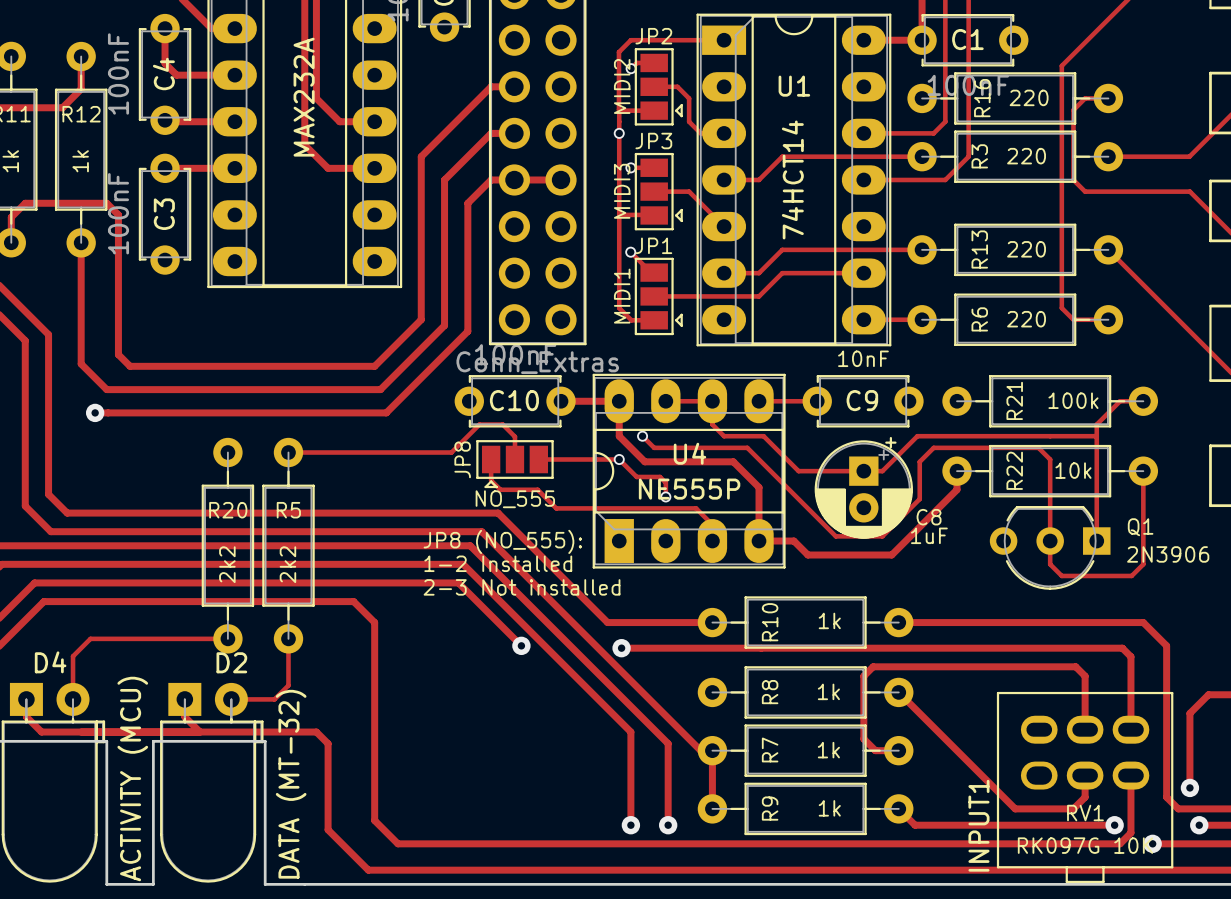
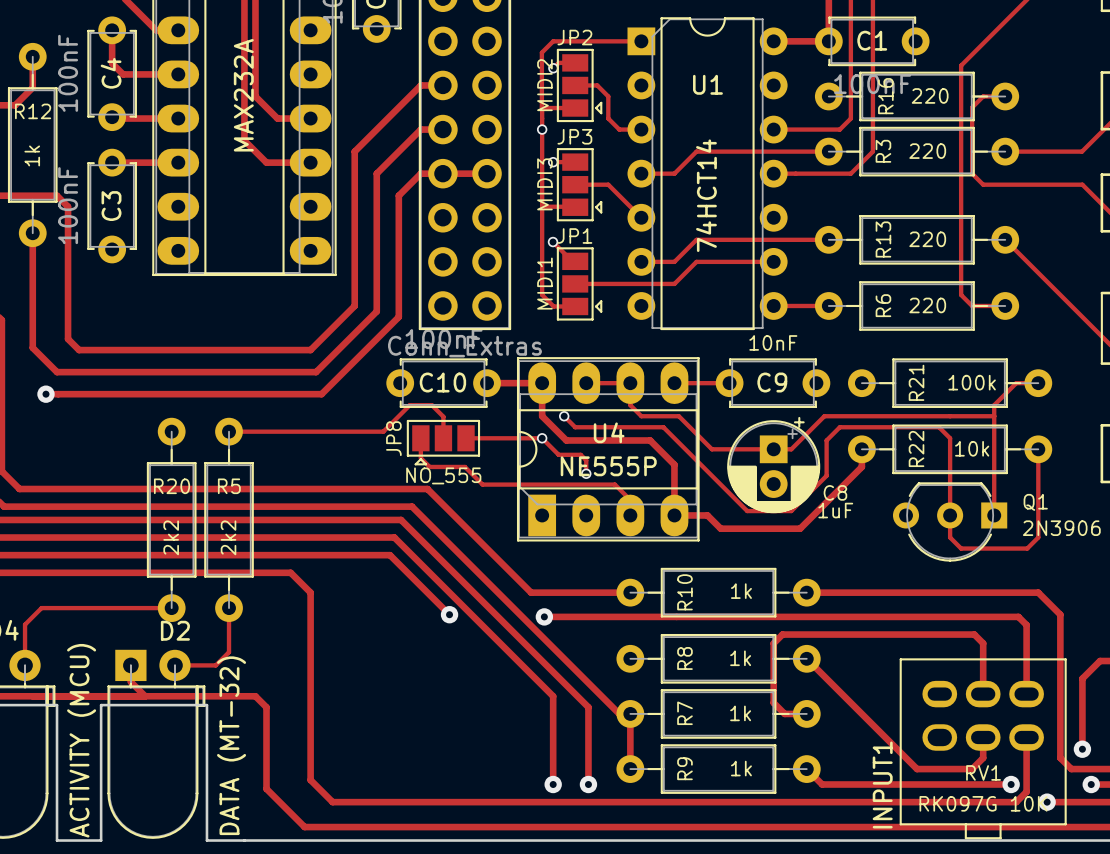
U1 footprint: [696, 13, 892, 347] -> [627, 17, 788, 331]
text: JP8 (NO_555): (502, 541) -> none
text: 1-2 Installed (498, 563) -> none
text: 2-3 Not installed (522, 587) -> none

